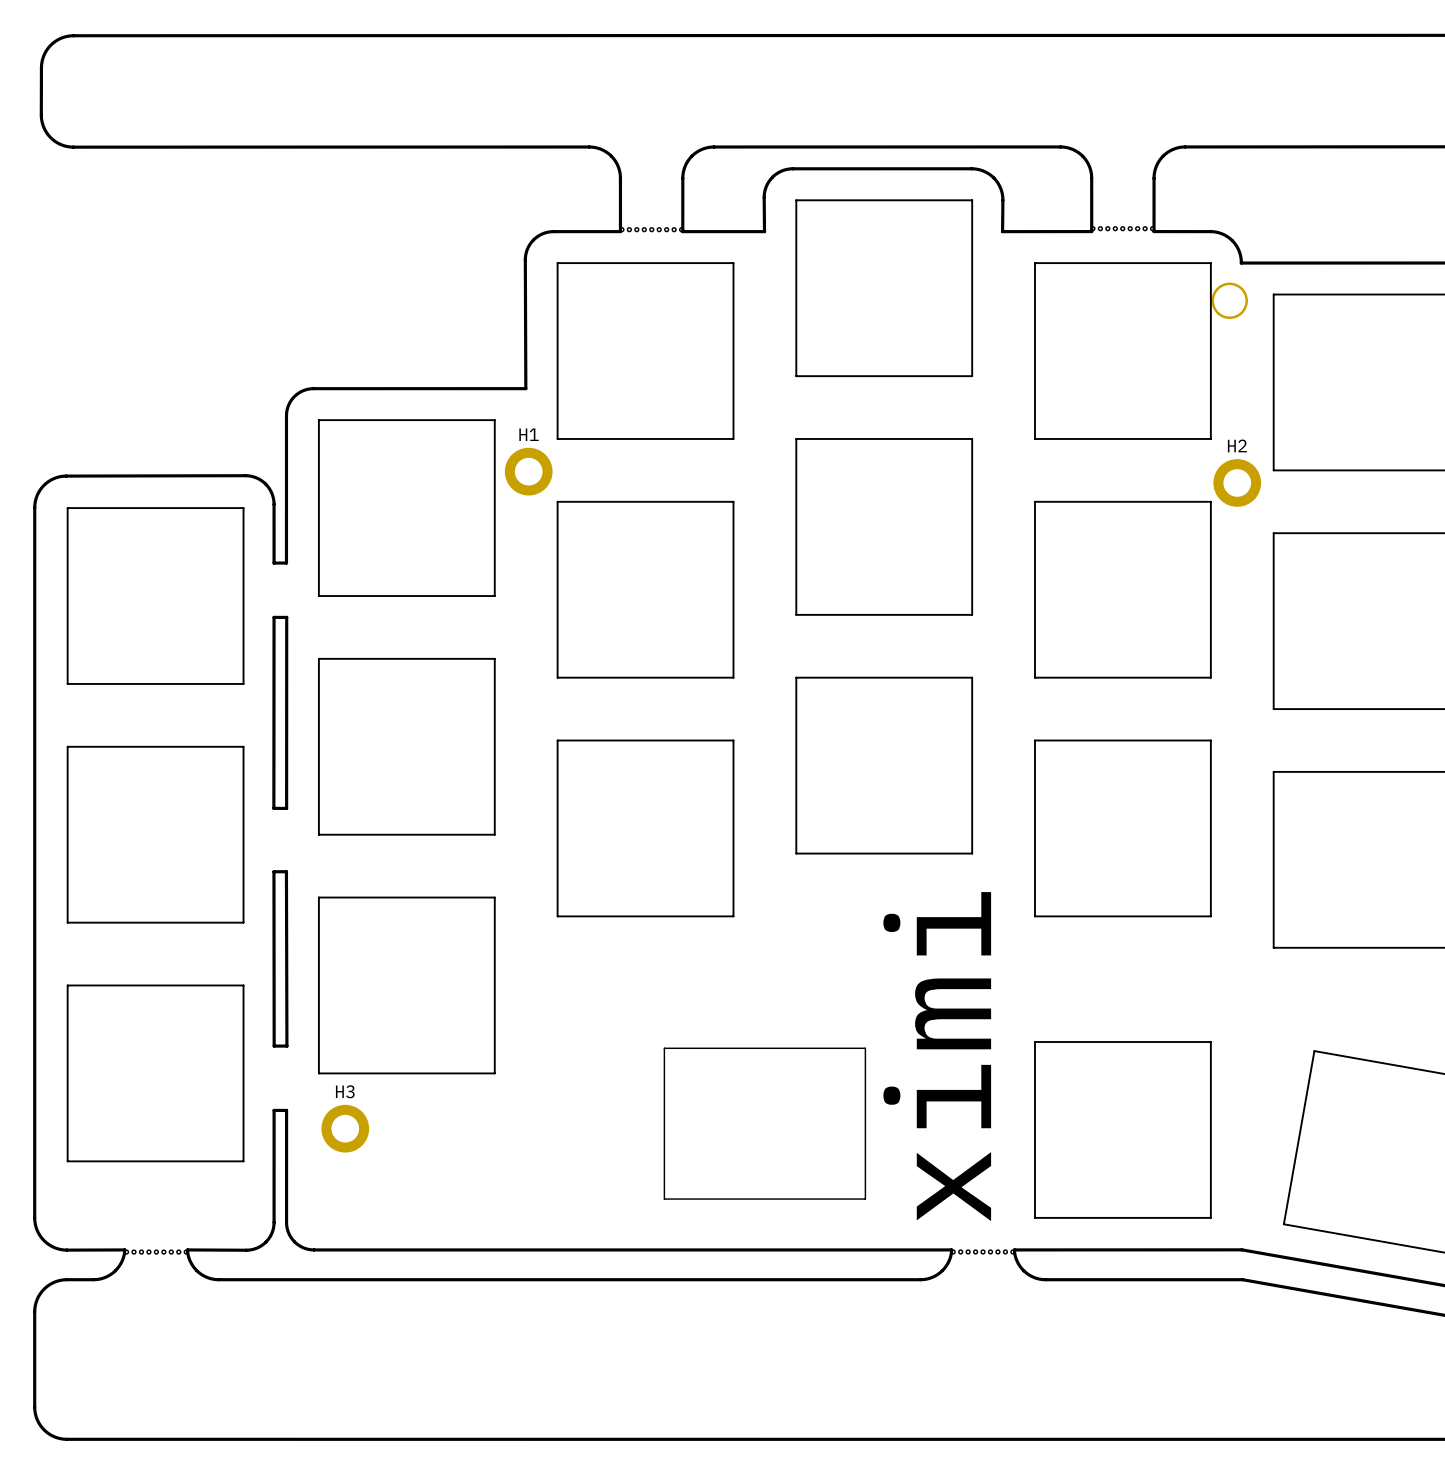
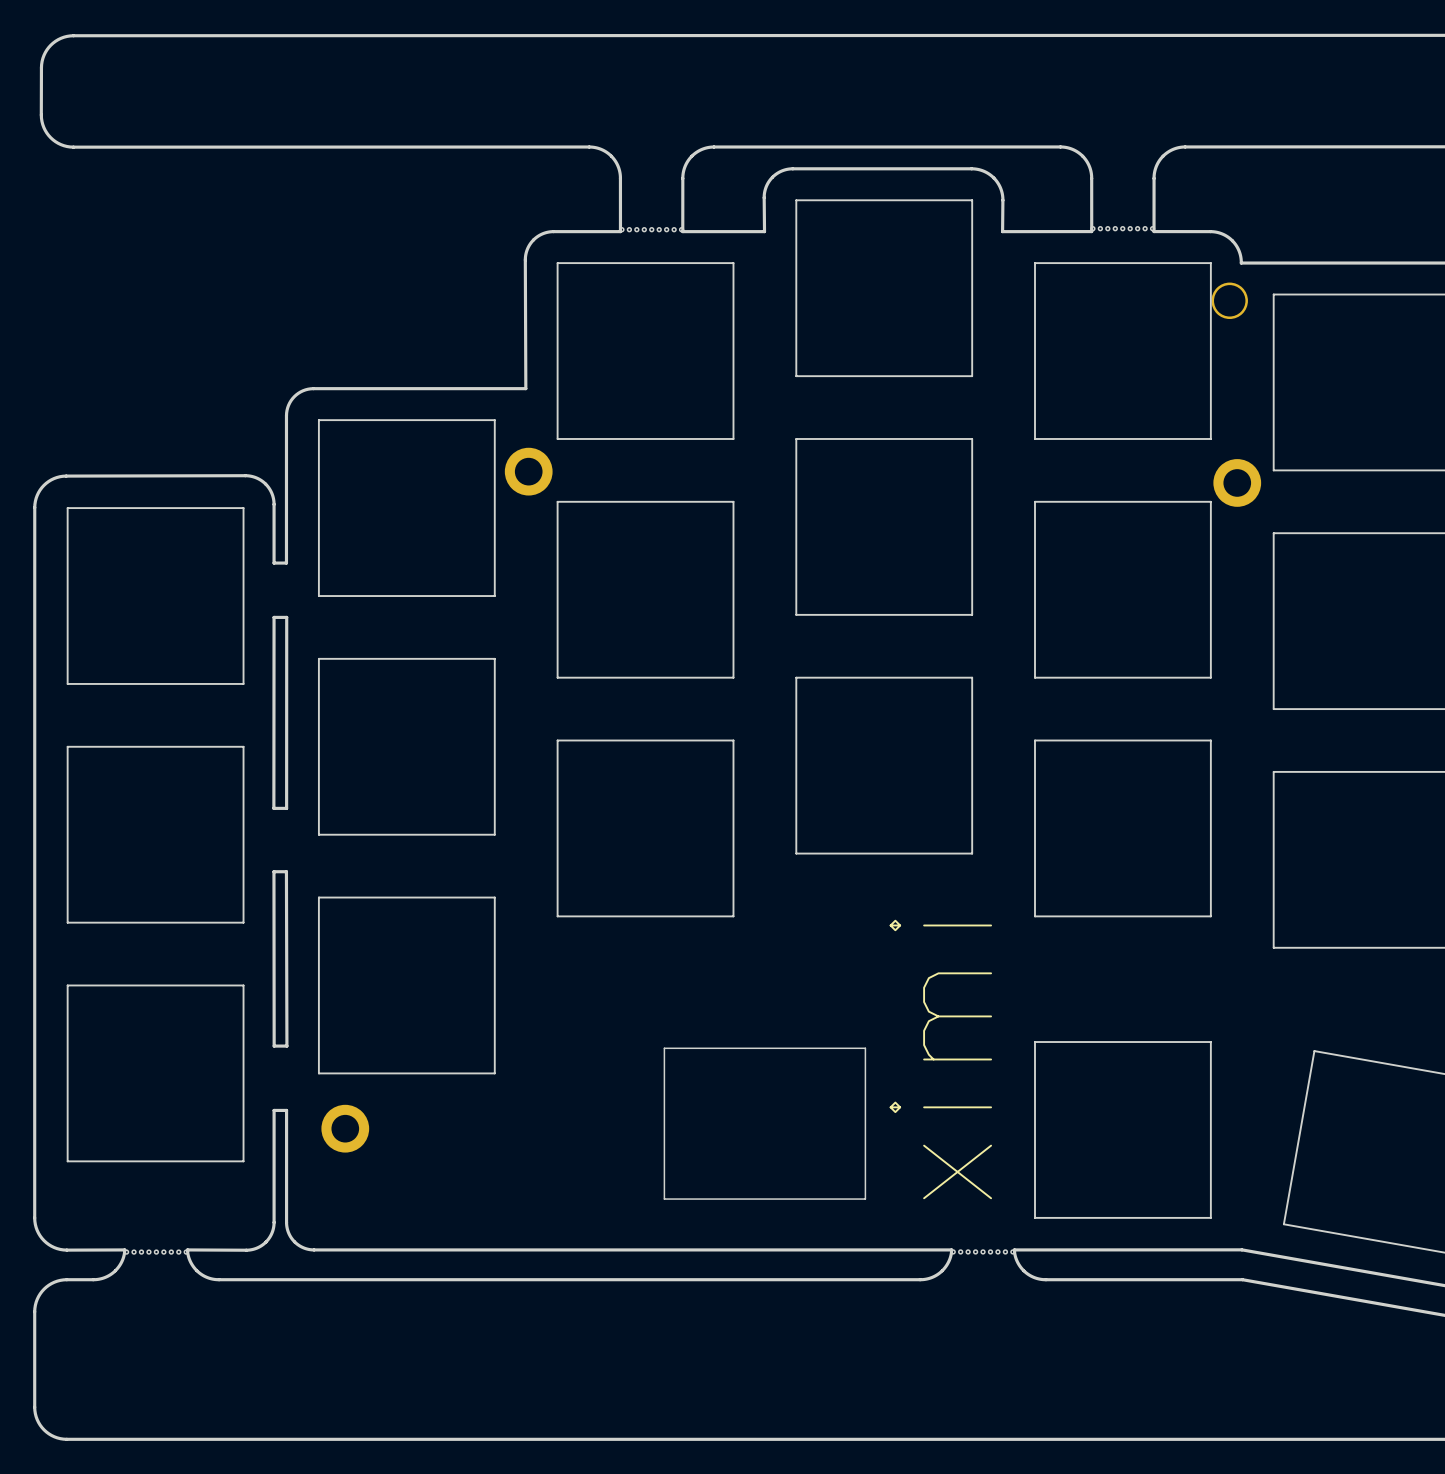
H1 name: H1 (529, 434) -> none
H2 name: H2 (1237, 445) -> none
H3 name: H3 (345, 1091) -> none

